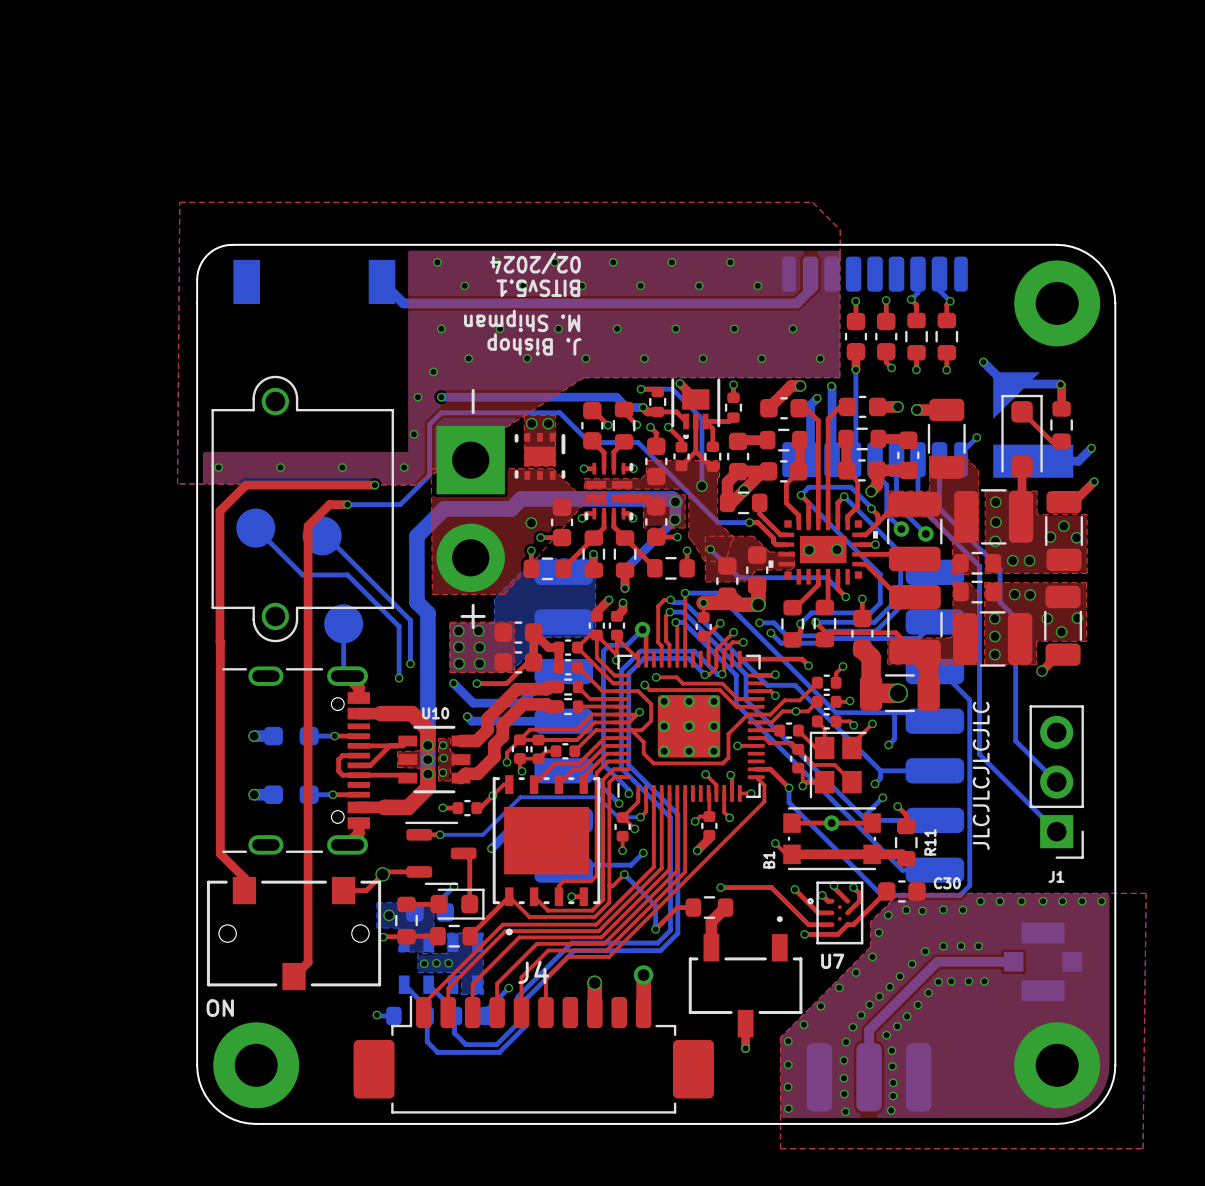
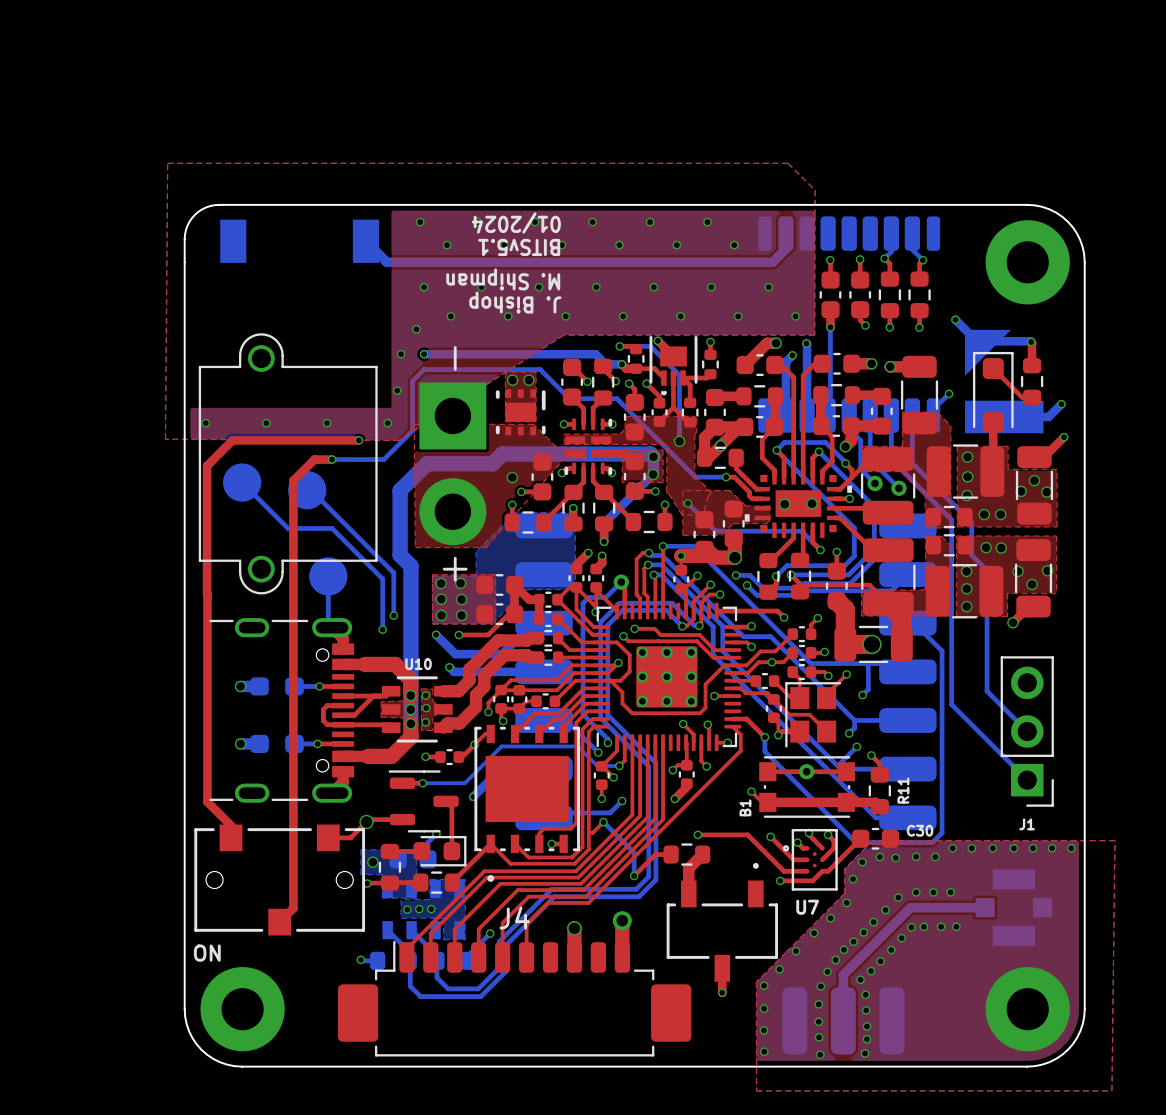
text: 02/2024 (535, 263) -> 01/2024 (516, 222)
text: JLCJLCJLCJLC (981, 775) -> none

